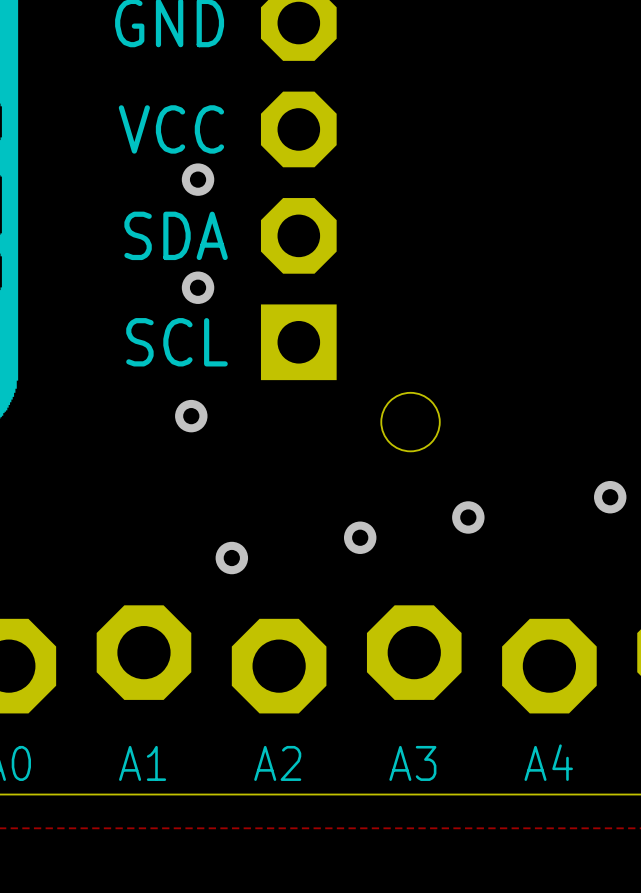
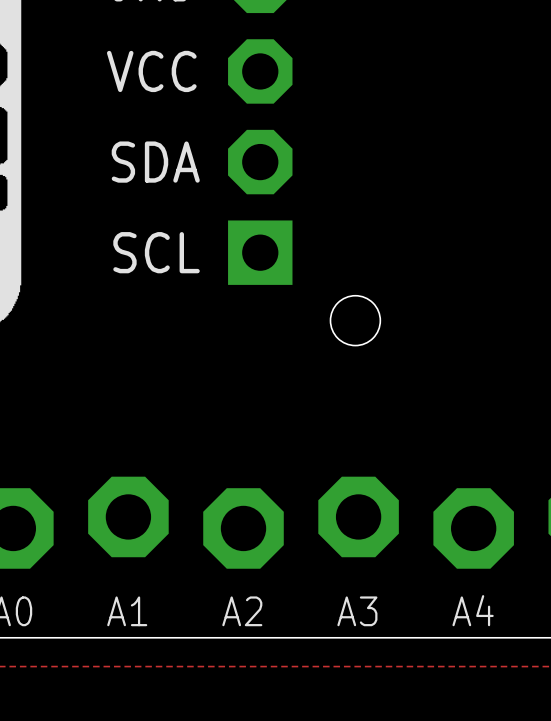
via: (198, 179) -> none
via: (198, 287) -> none
via: (191, 416) -> none
via: (610, 497) -> none
via: (468, 517) -> none
via: (360, 537) -> none
via: (231, 558) -> none

